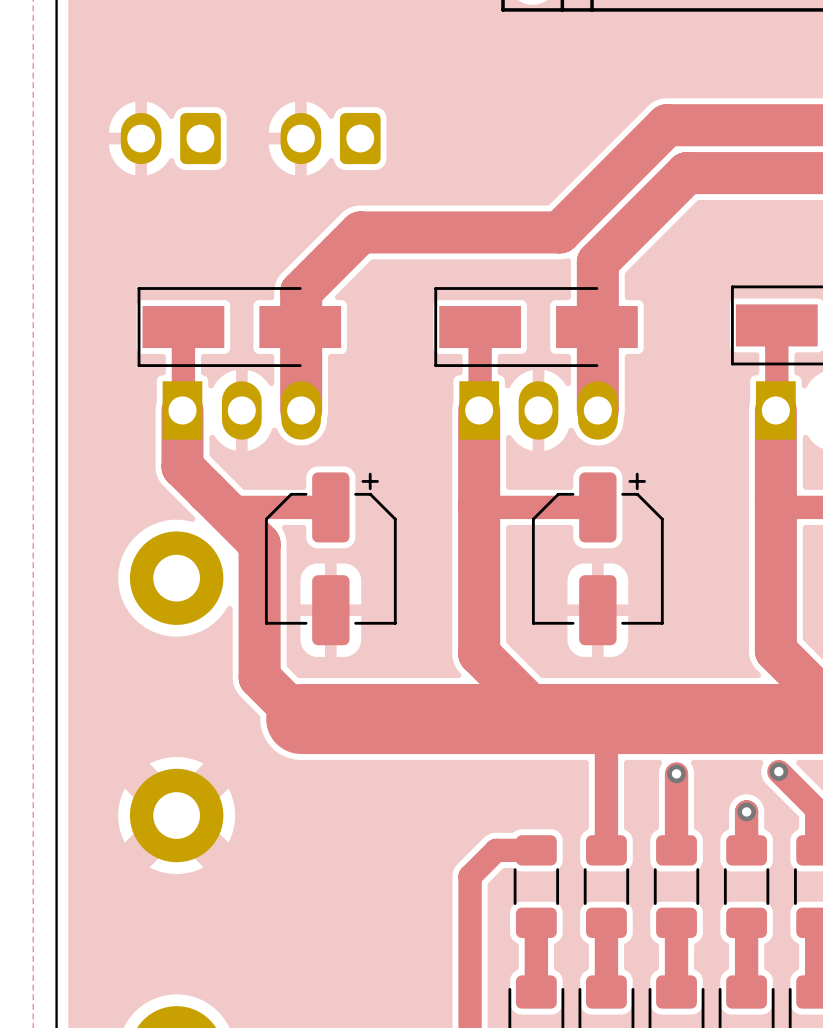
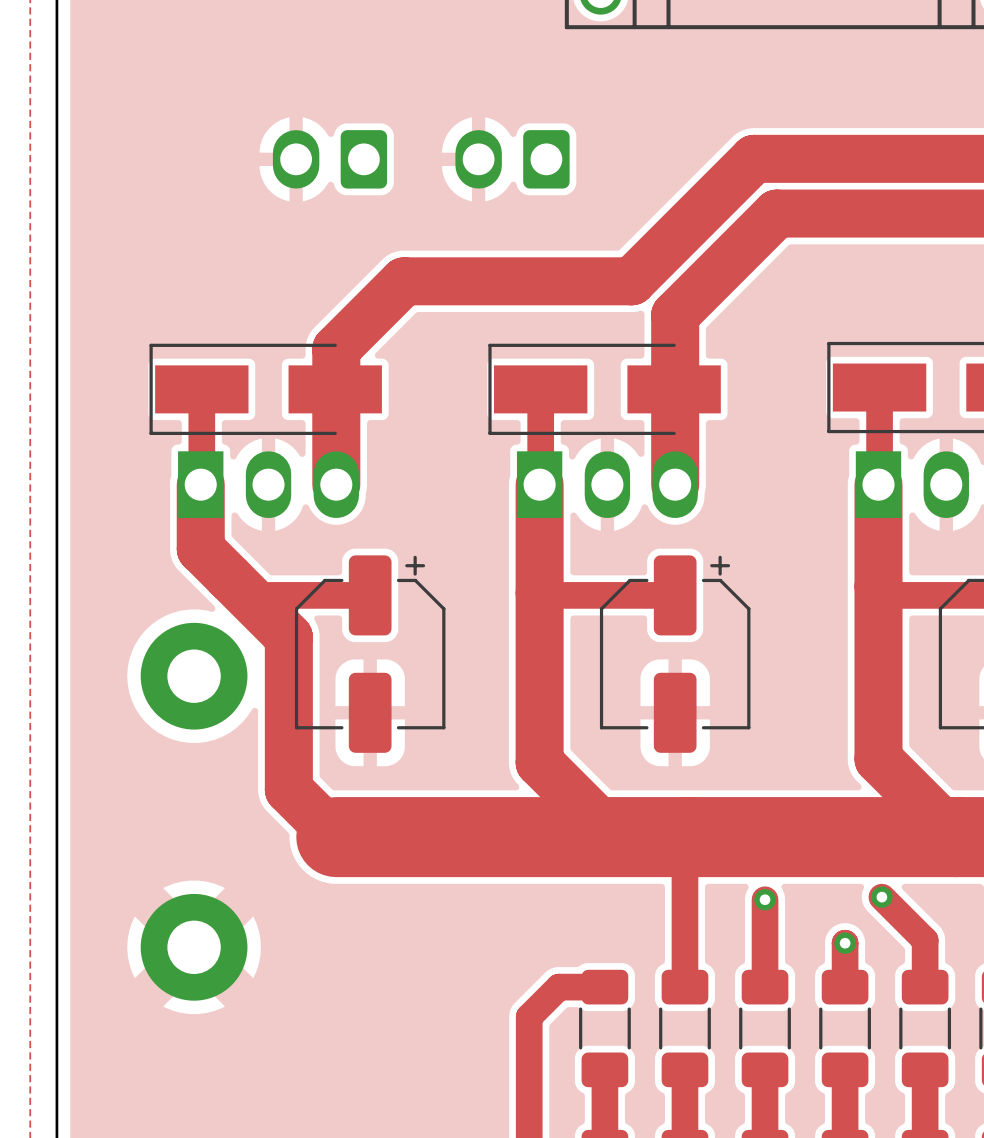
part: none -> (512, 159)
part: (170, 138) -> none
part position: (330, 138) -> (330, 159)

